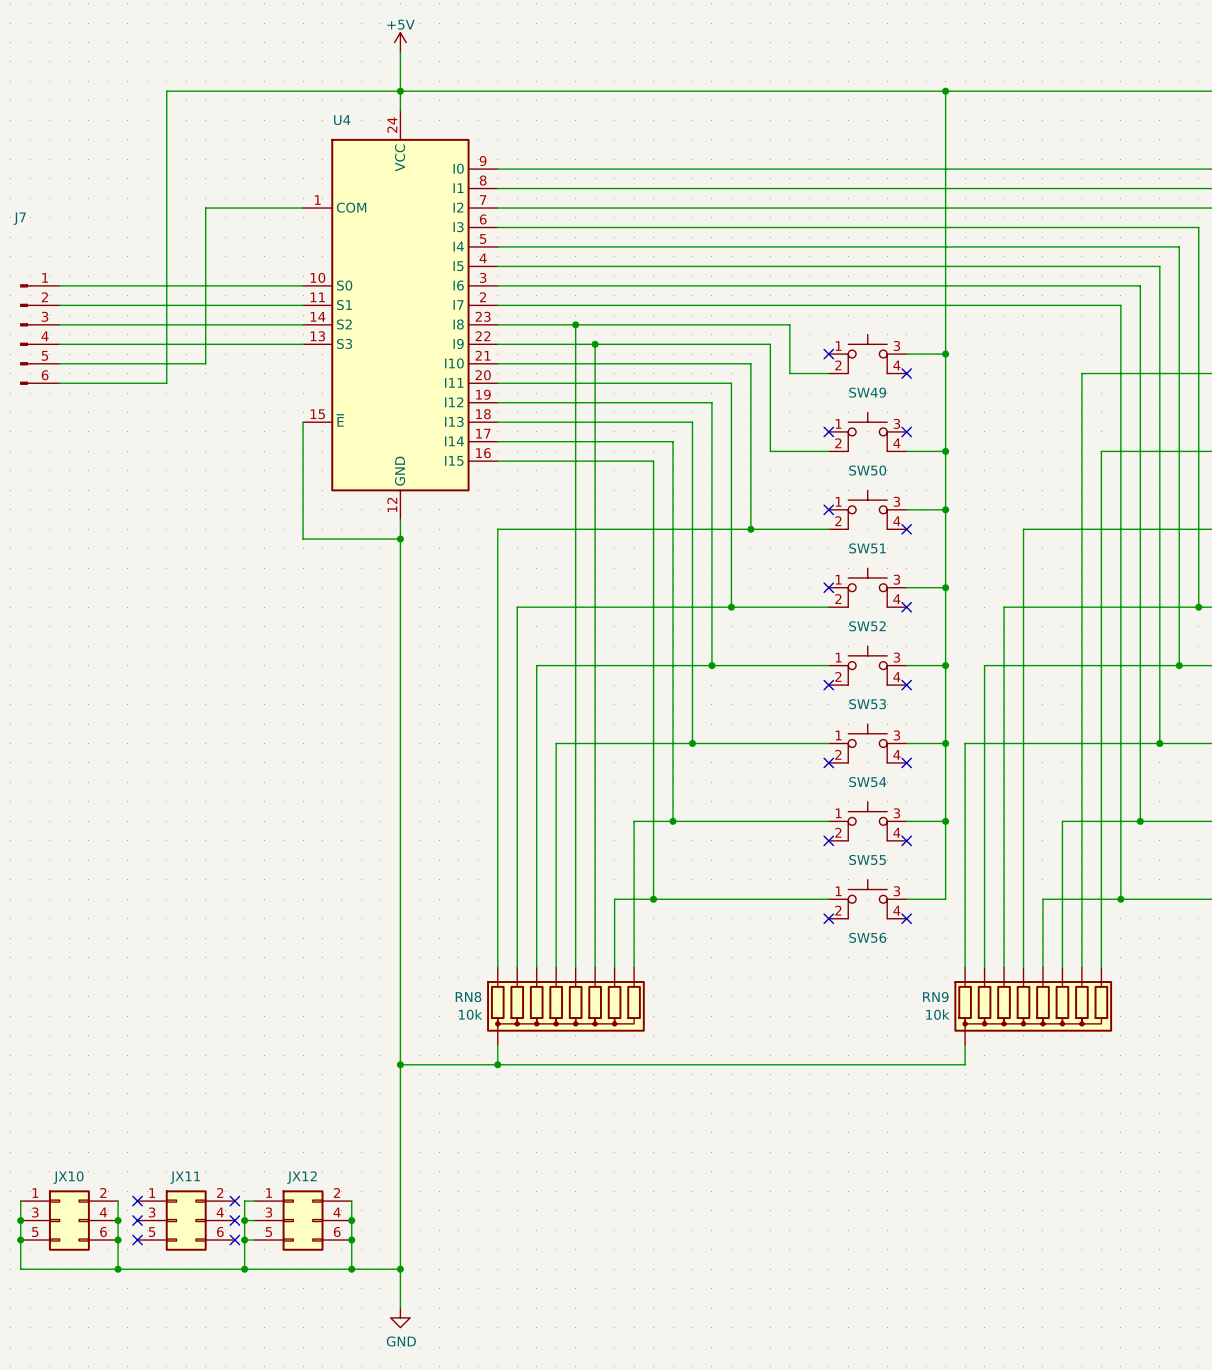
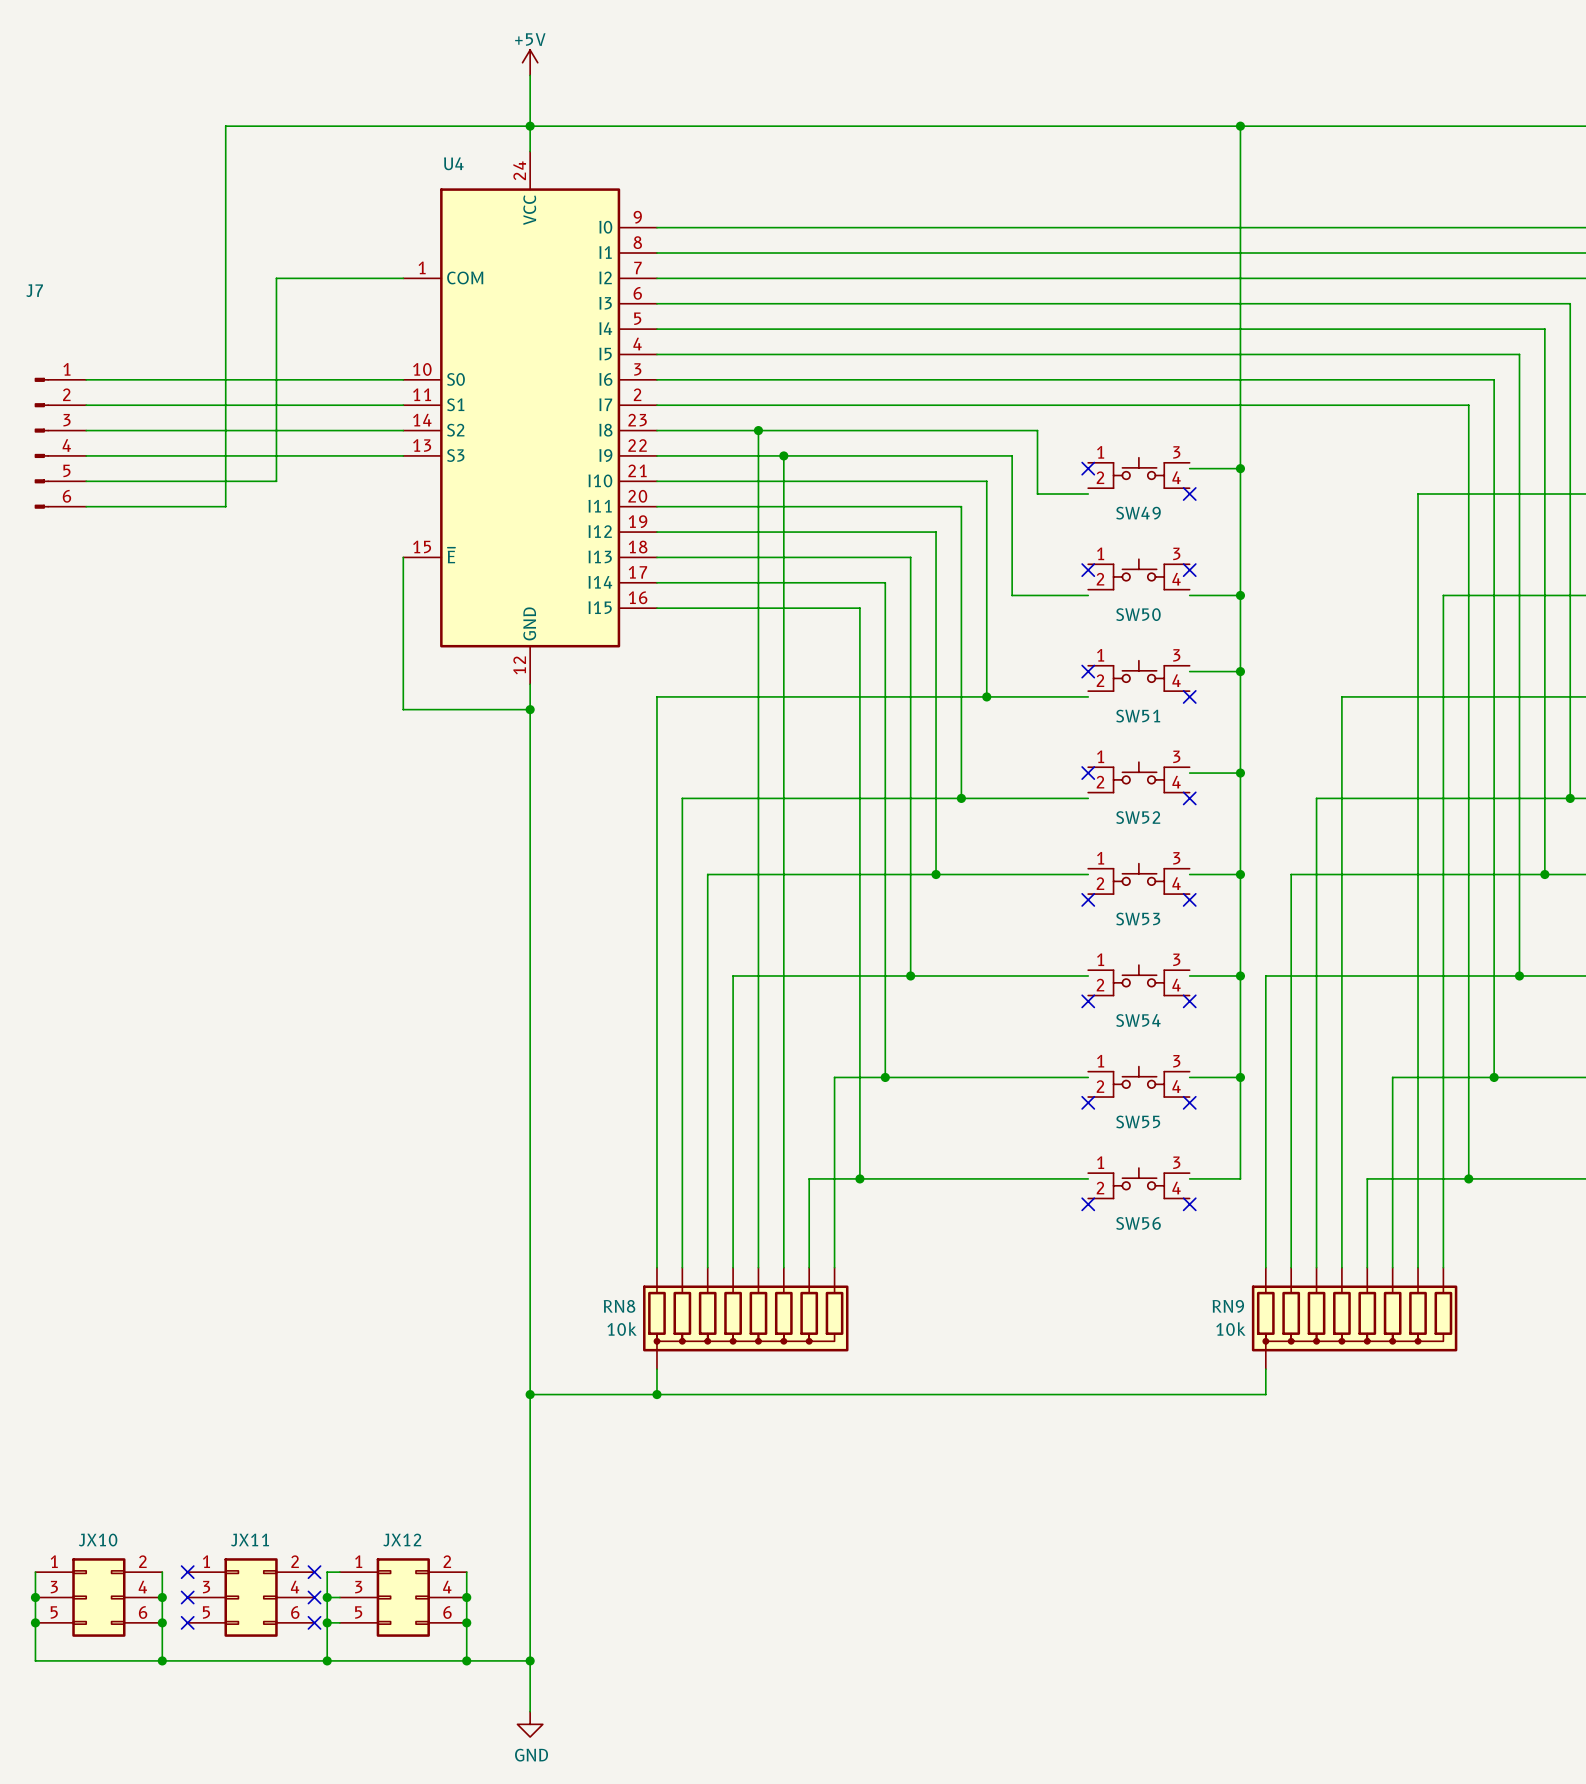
SW49 symbol: [828, 334, 907, 374] -> [1088, 457, 1190, 489]
SW50 symbol: [828, 412, 907, 452] -> [1088, 559, 1190, 590]
SW51 symbol: [828, 490, 907, 530] -> [1088, 660, 1190, 692]
SW52 symbol: [828, 568, 907, 608] -> [1088, 762, 1190, 793]
SW53 symbol: [828, 646, 907, 686] -> [1088, 863, 1190, 895]
SW54 symbol: [828, 724, 907, 763] -> [1088, 965, 1190, 996]
SW55 symbol: [828, 801, 907, 841] -> [1088, 1066, 1190, 1098]
SW56 symbol: [828, 879, 907, 919] -> [1088, 1168, 1190, 1199]

